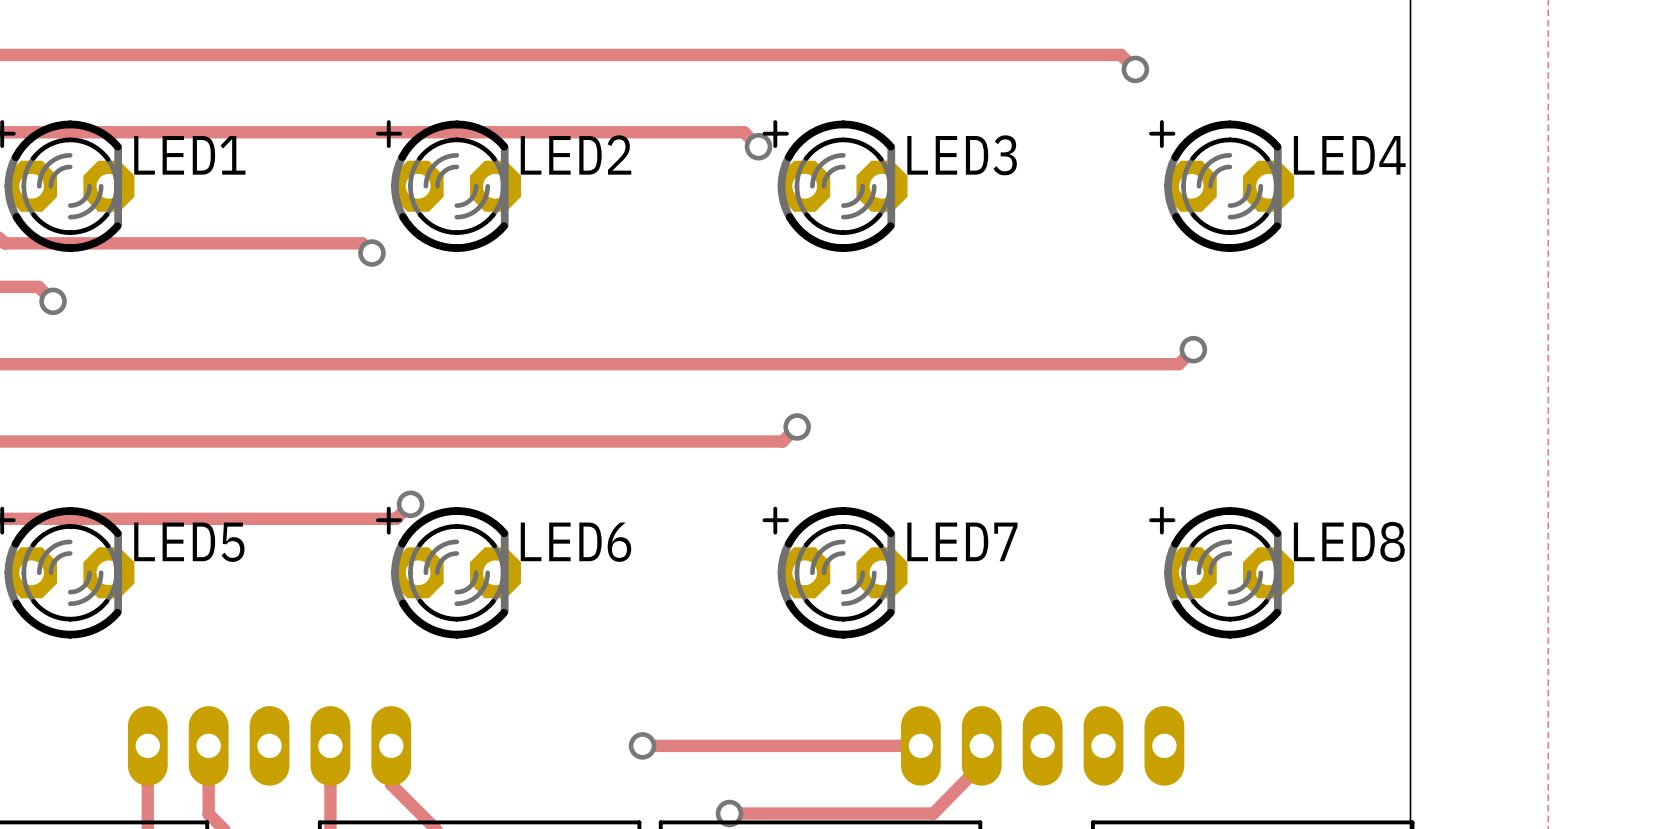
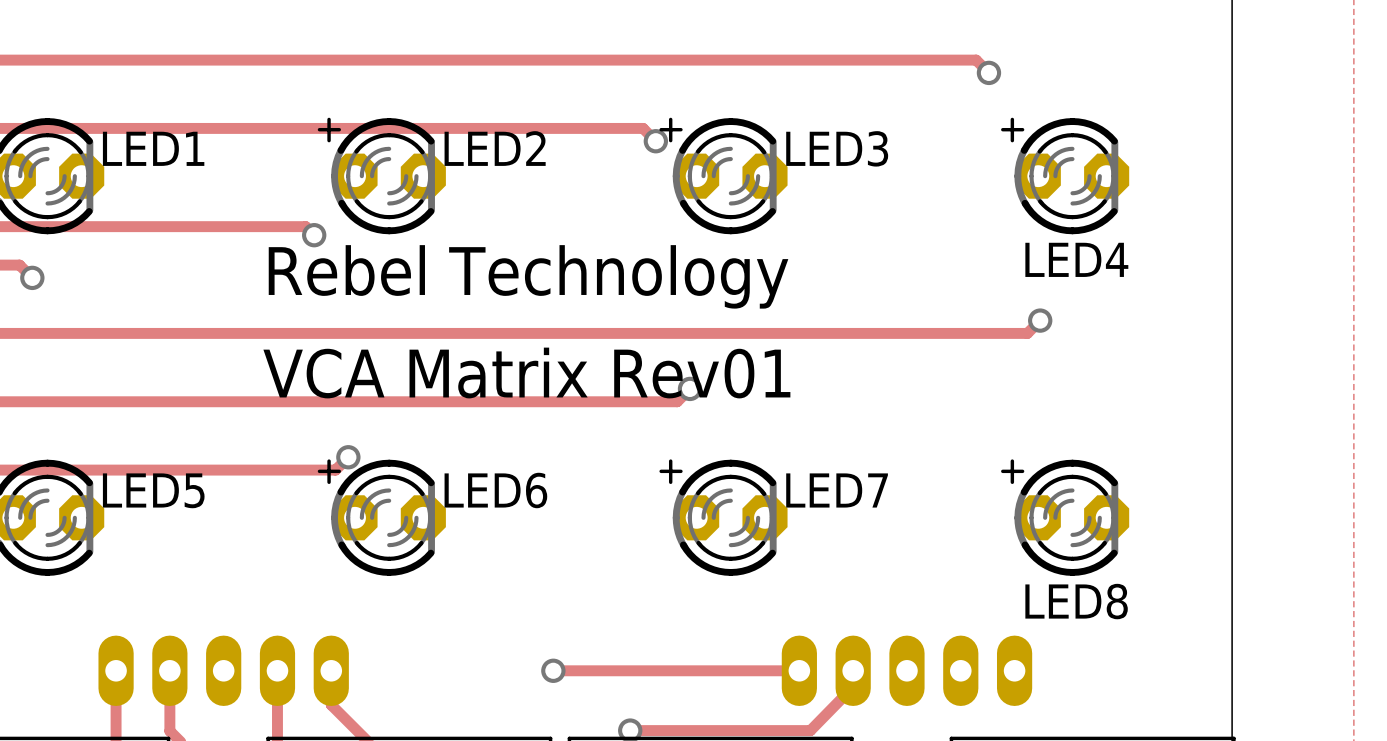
LED4 name position: LED4 (1349, 155) -> LED4 (1076, 259)
text: none -> Rebel Technology (528, 276)
text: none -> VCA Matrix Rev01 (526, 373)
LED8 name position: LED8 (1349, 541) -> LED8 (1076, 601)

